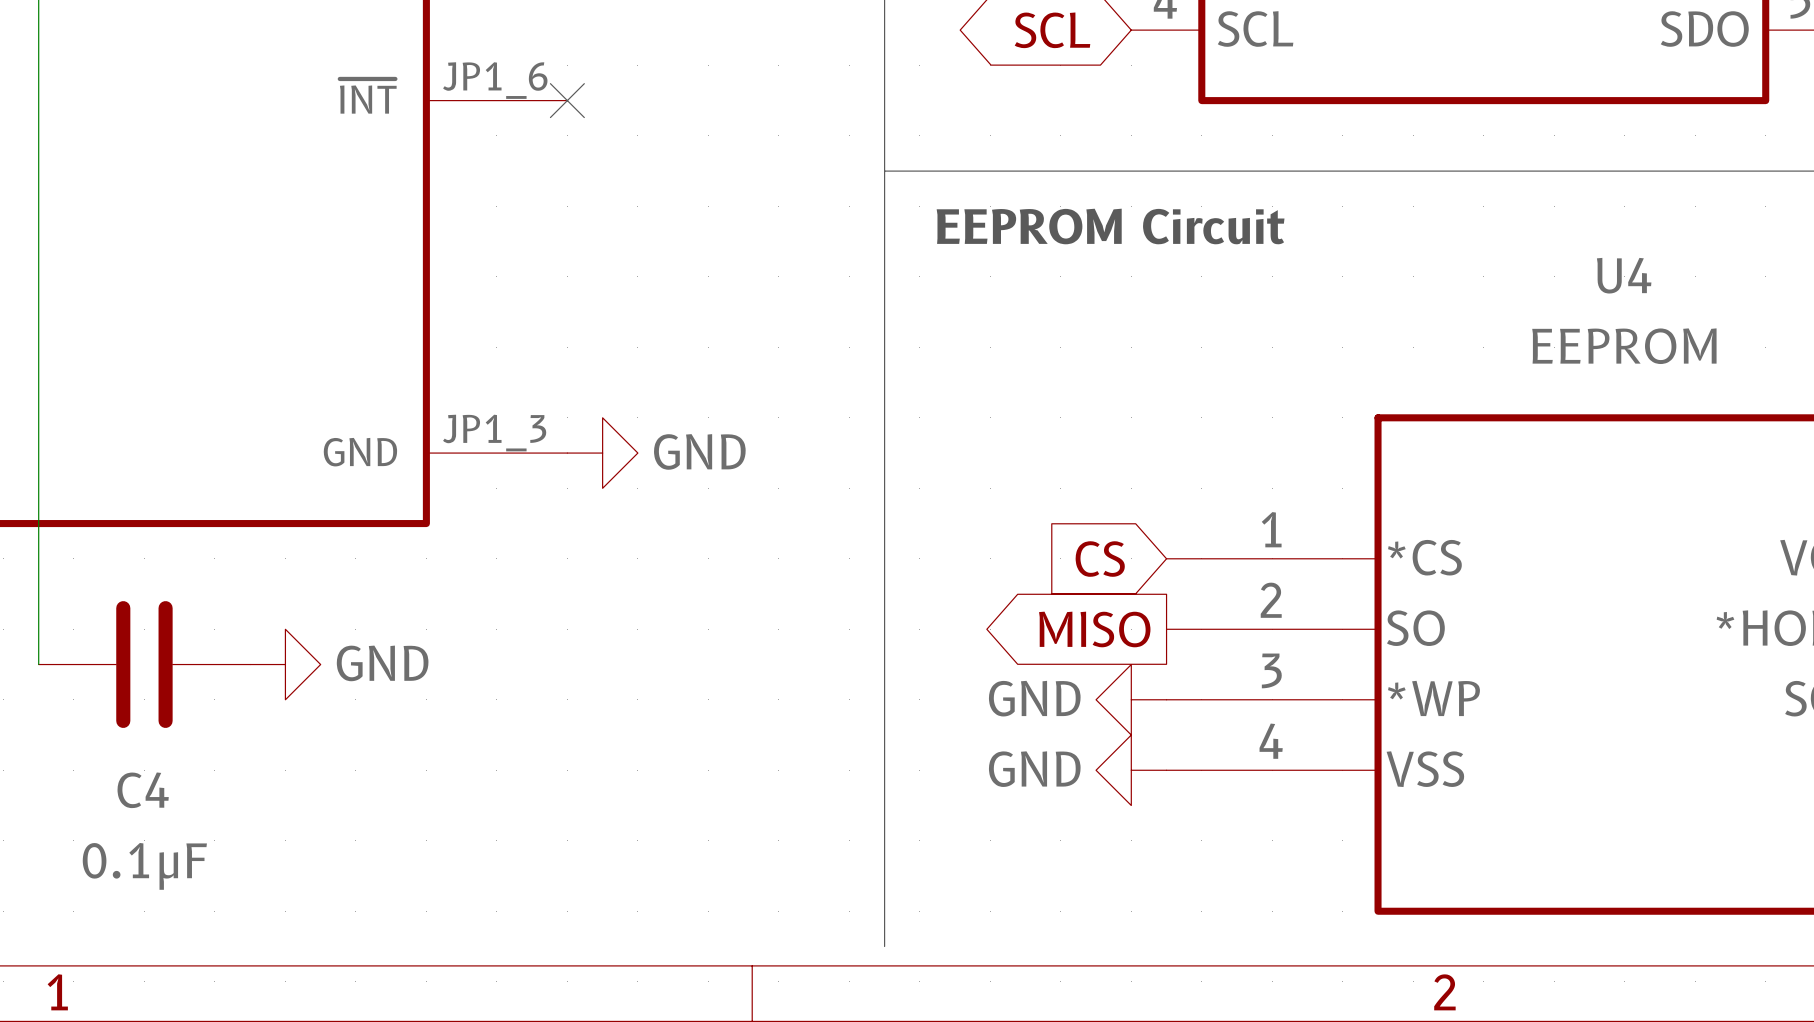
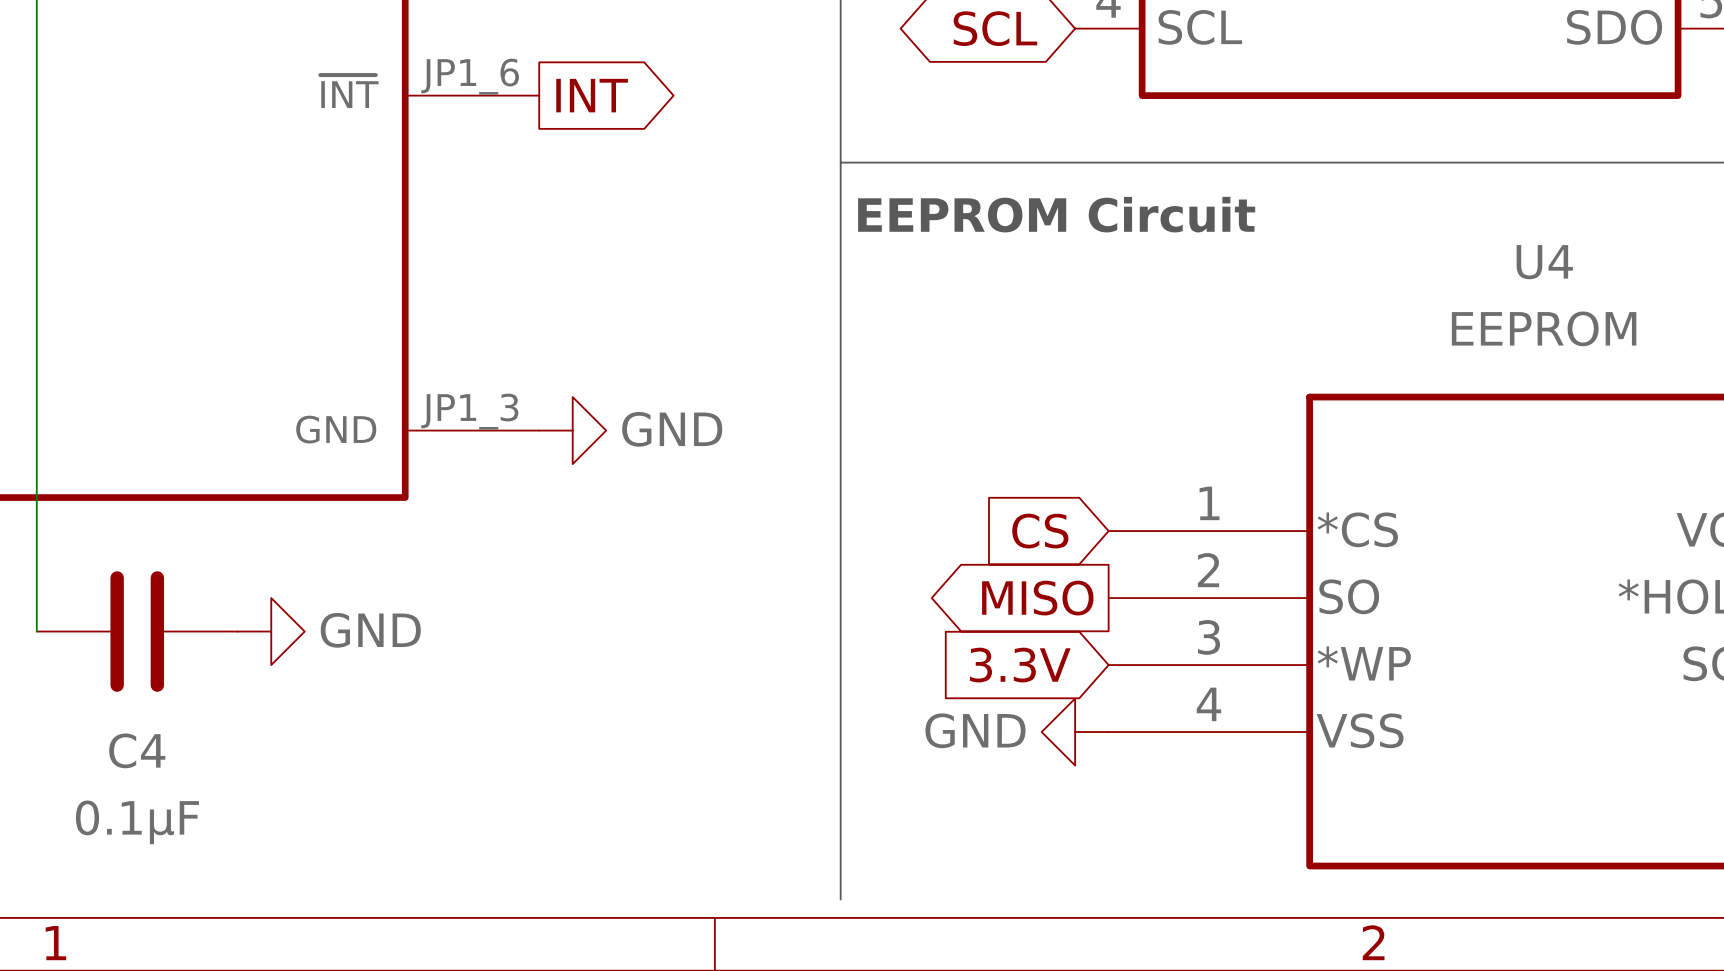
no-connect mark: (567, 100) -> none
global label: none -> INT (592, 95)
power symbol: GND (1131, 699) -> none
global label: none -> 3.3V (1020, 665)

